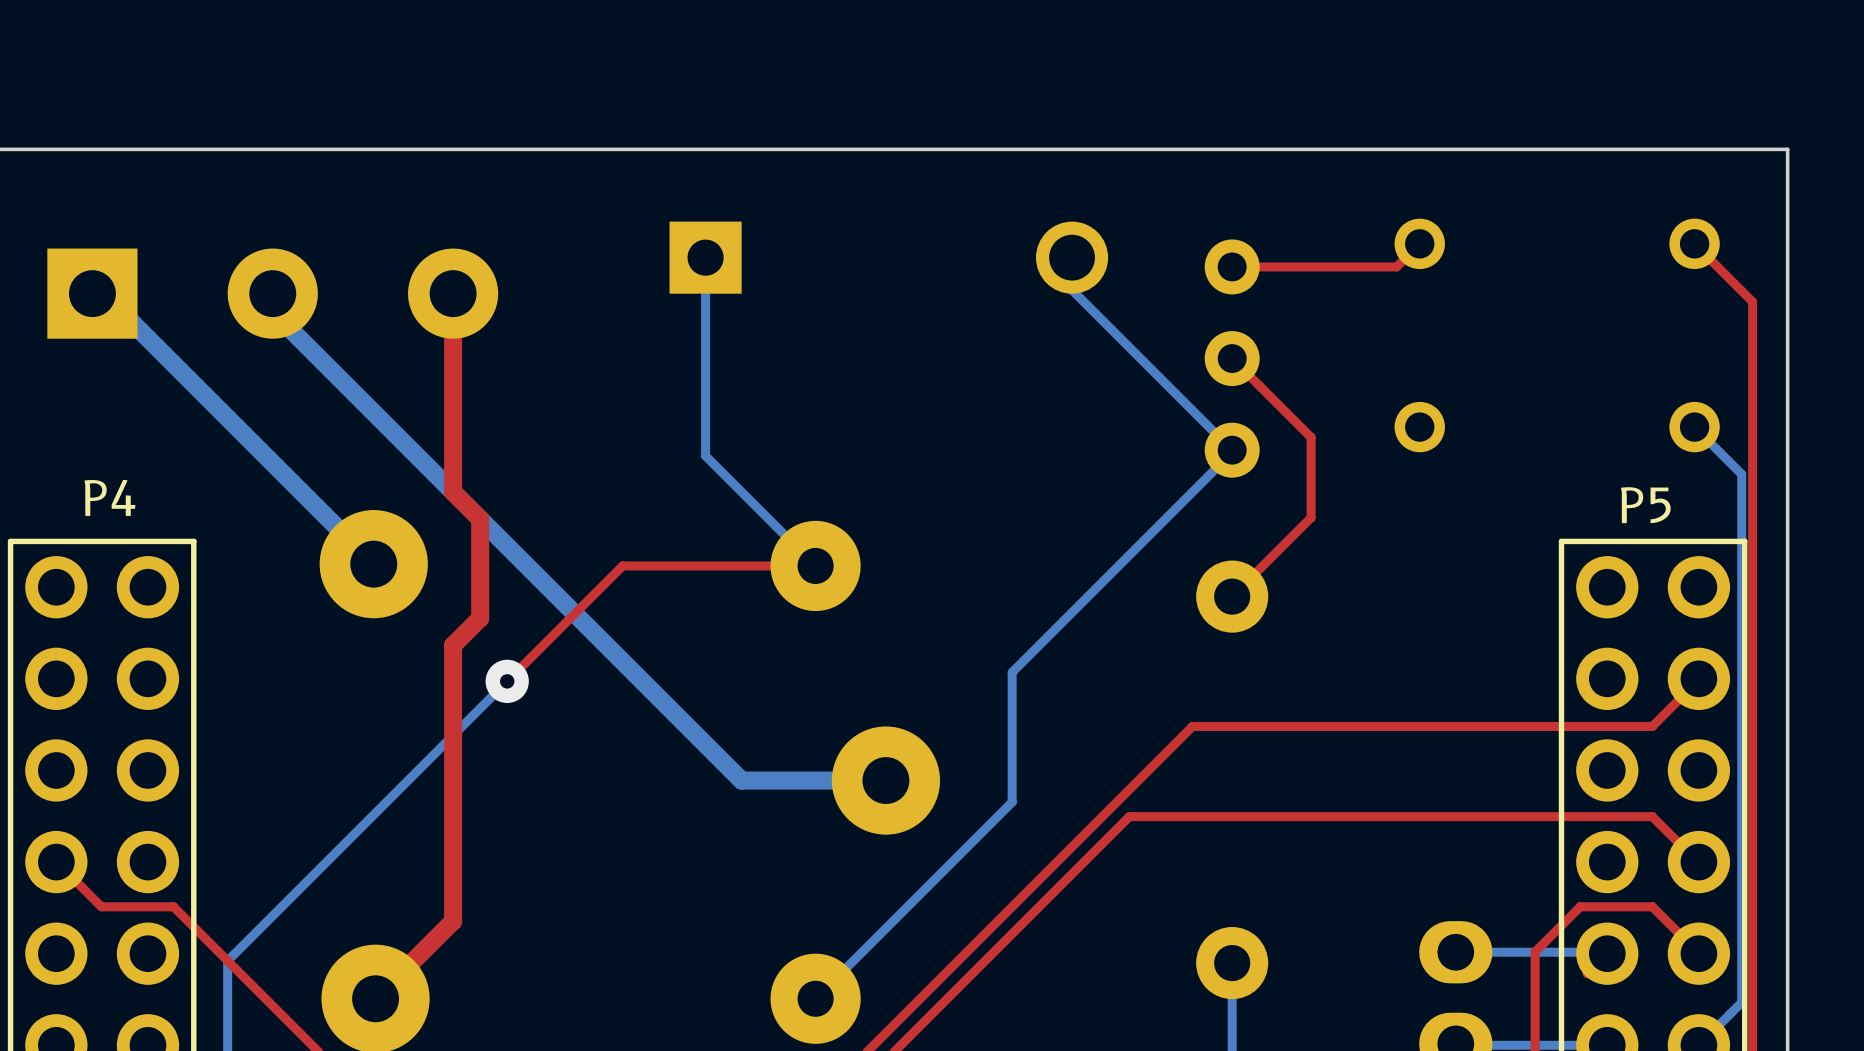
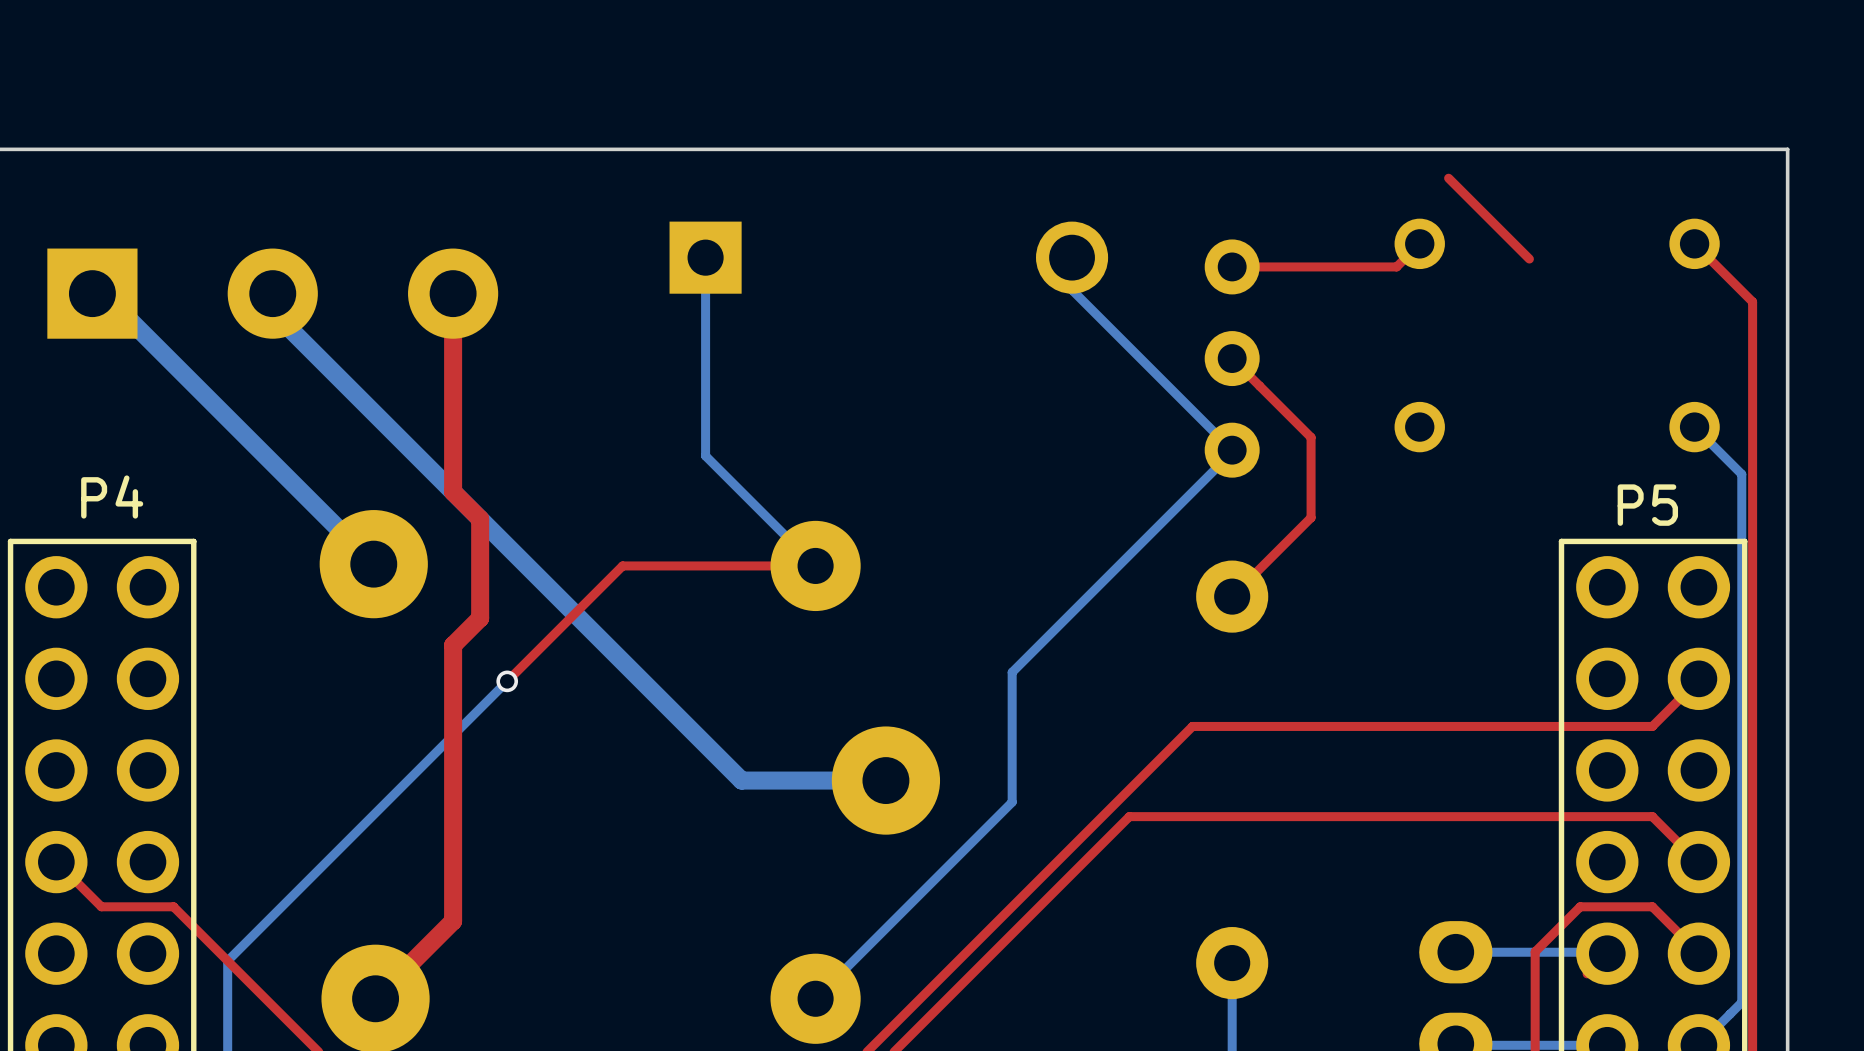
top track: none -> (1448, 178) (1529, 259)
via size: [485, 659, 529, 704] -> [496, 670, 519, 693]

